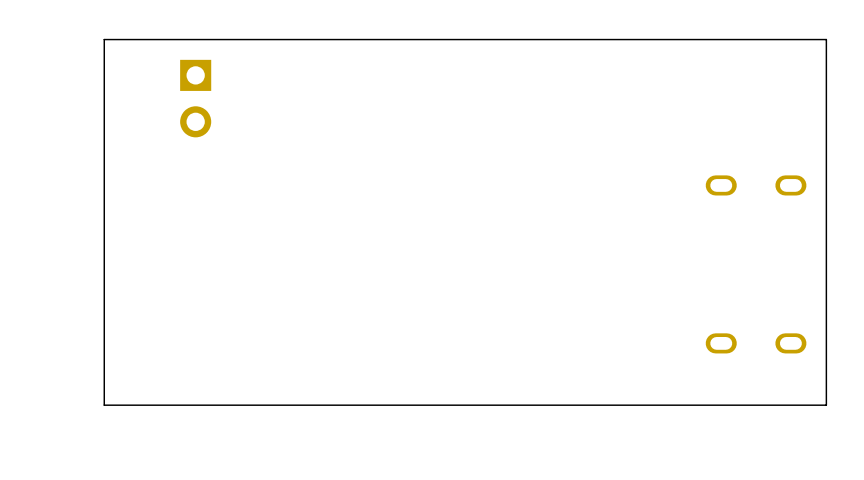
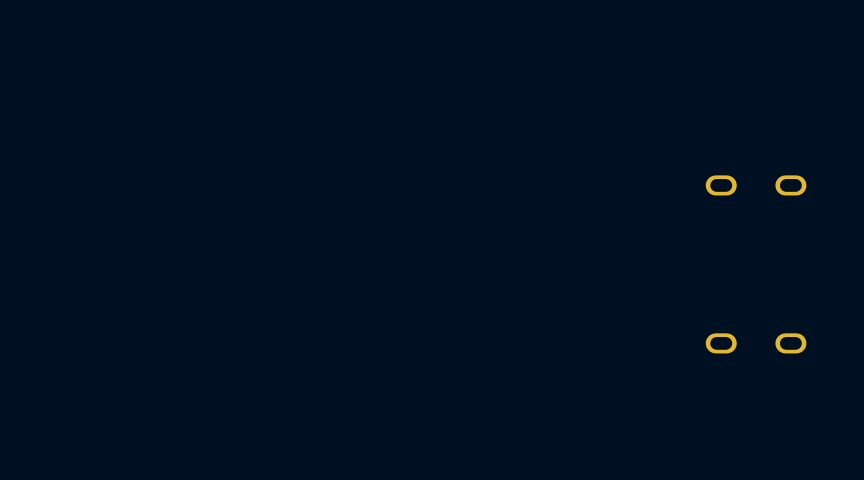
board edge: (826, 39) (104, 39) (104, 405) (826, 405) (826, 39) -> none
part: (195, 98) -> none

